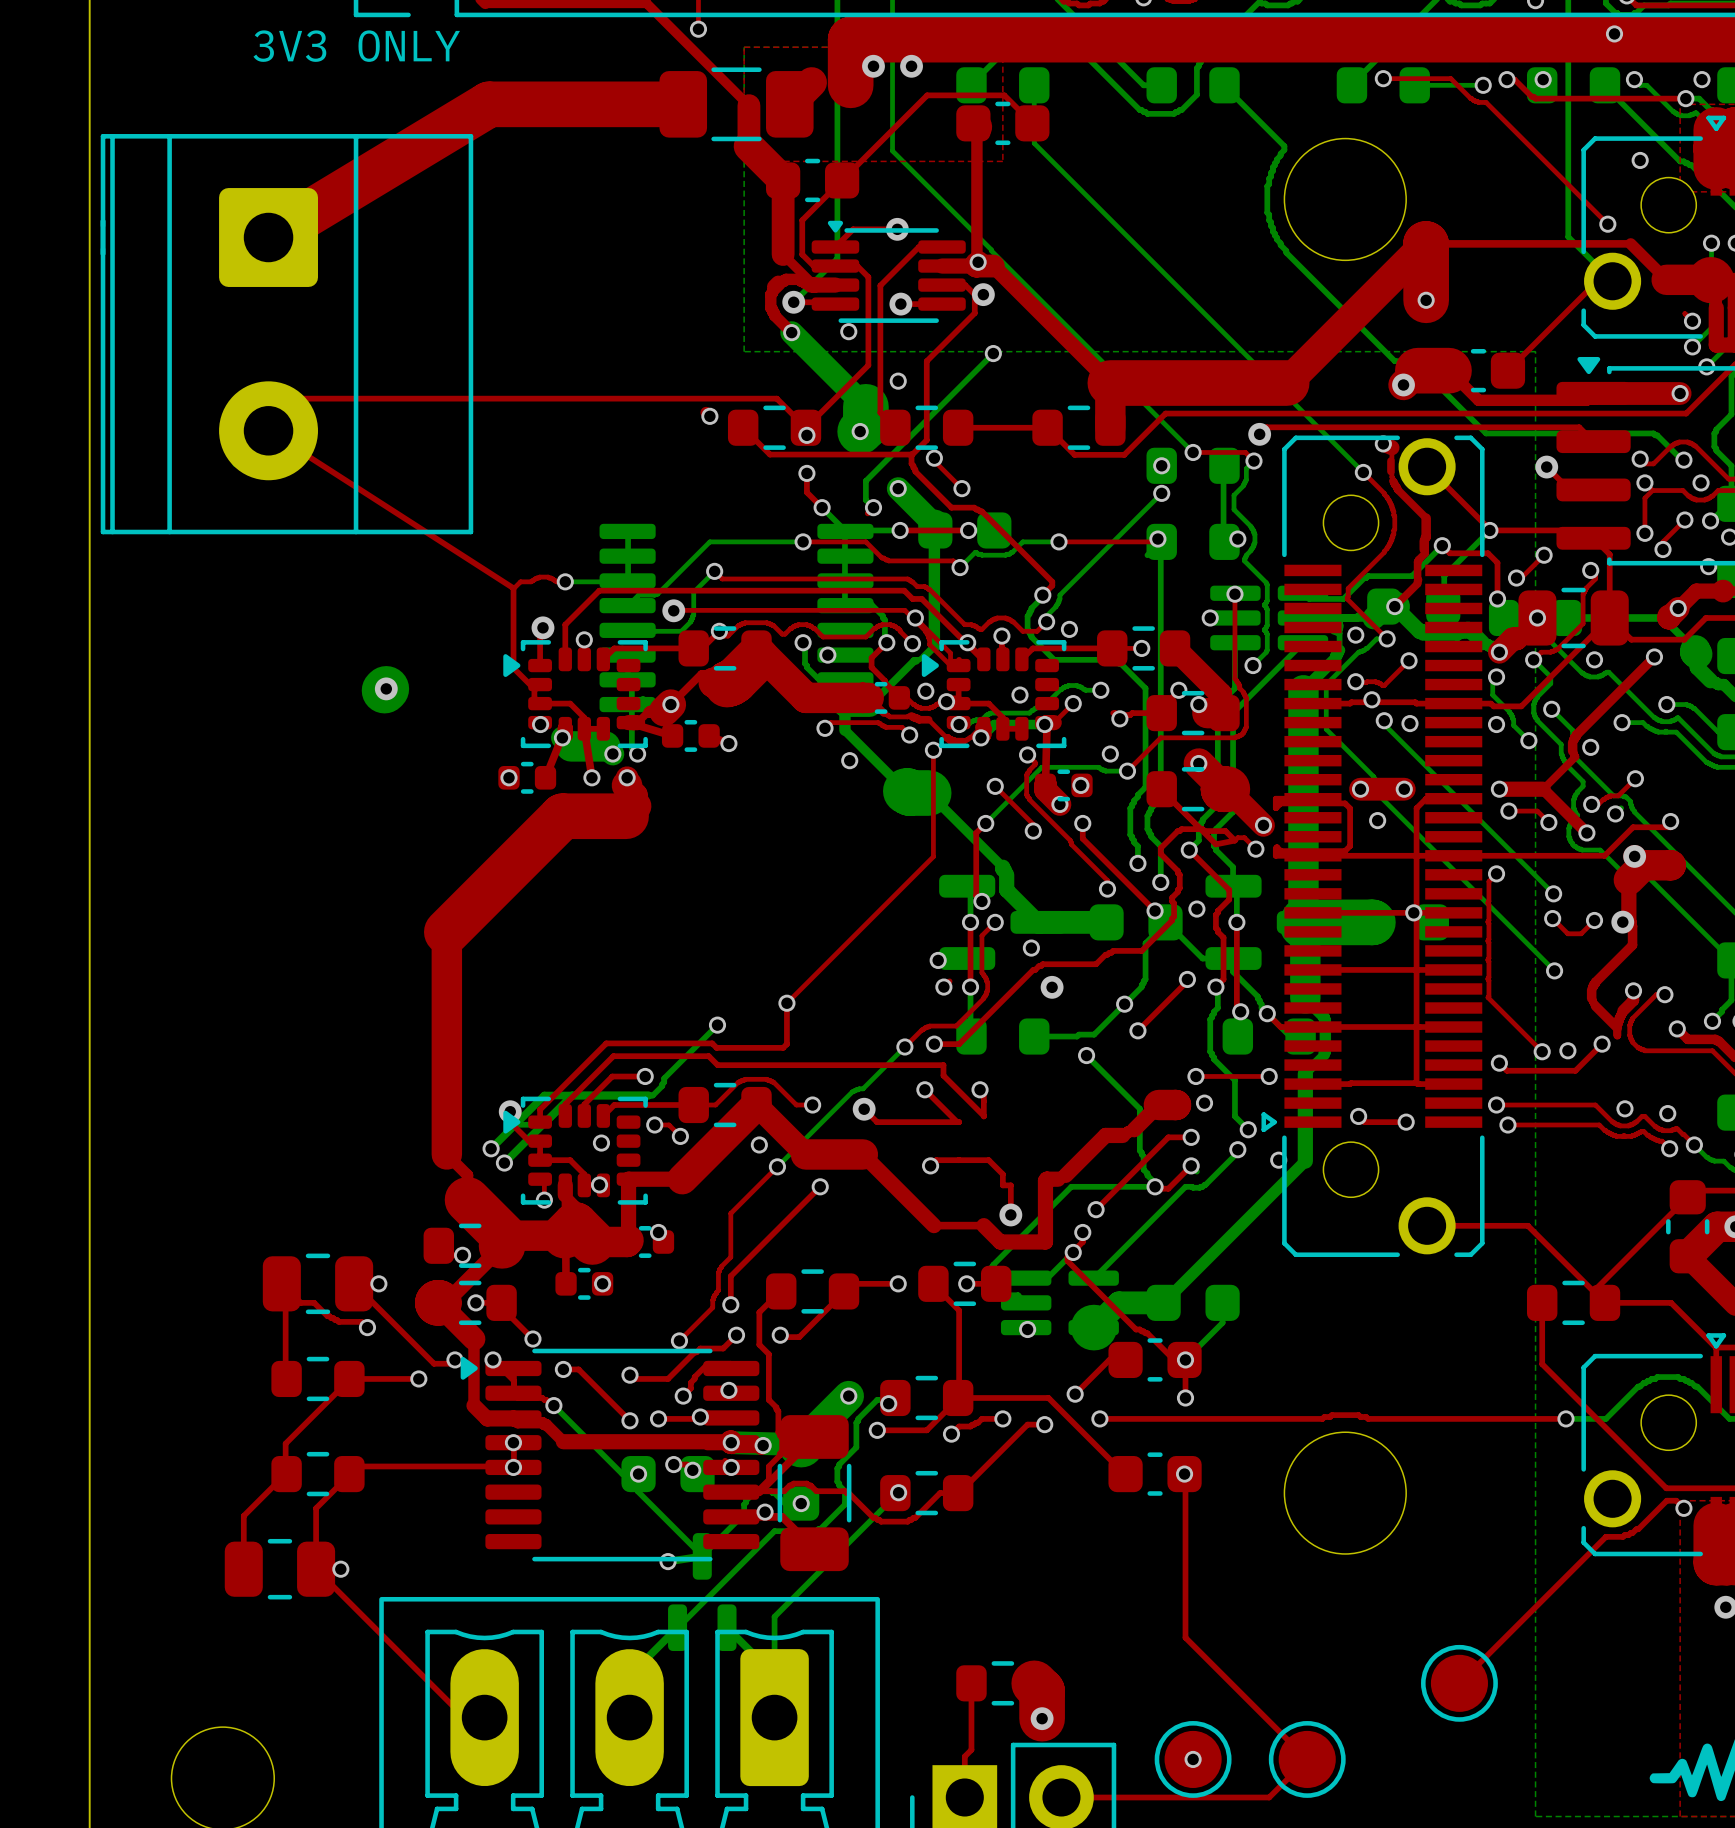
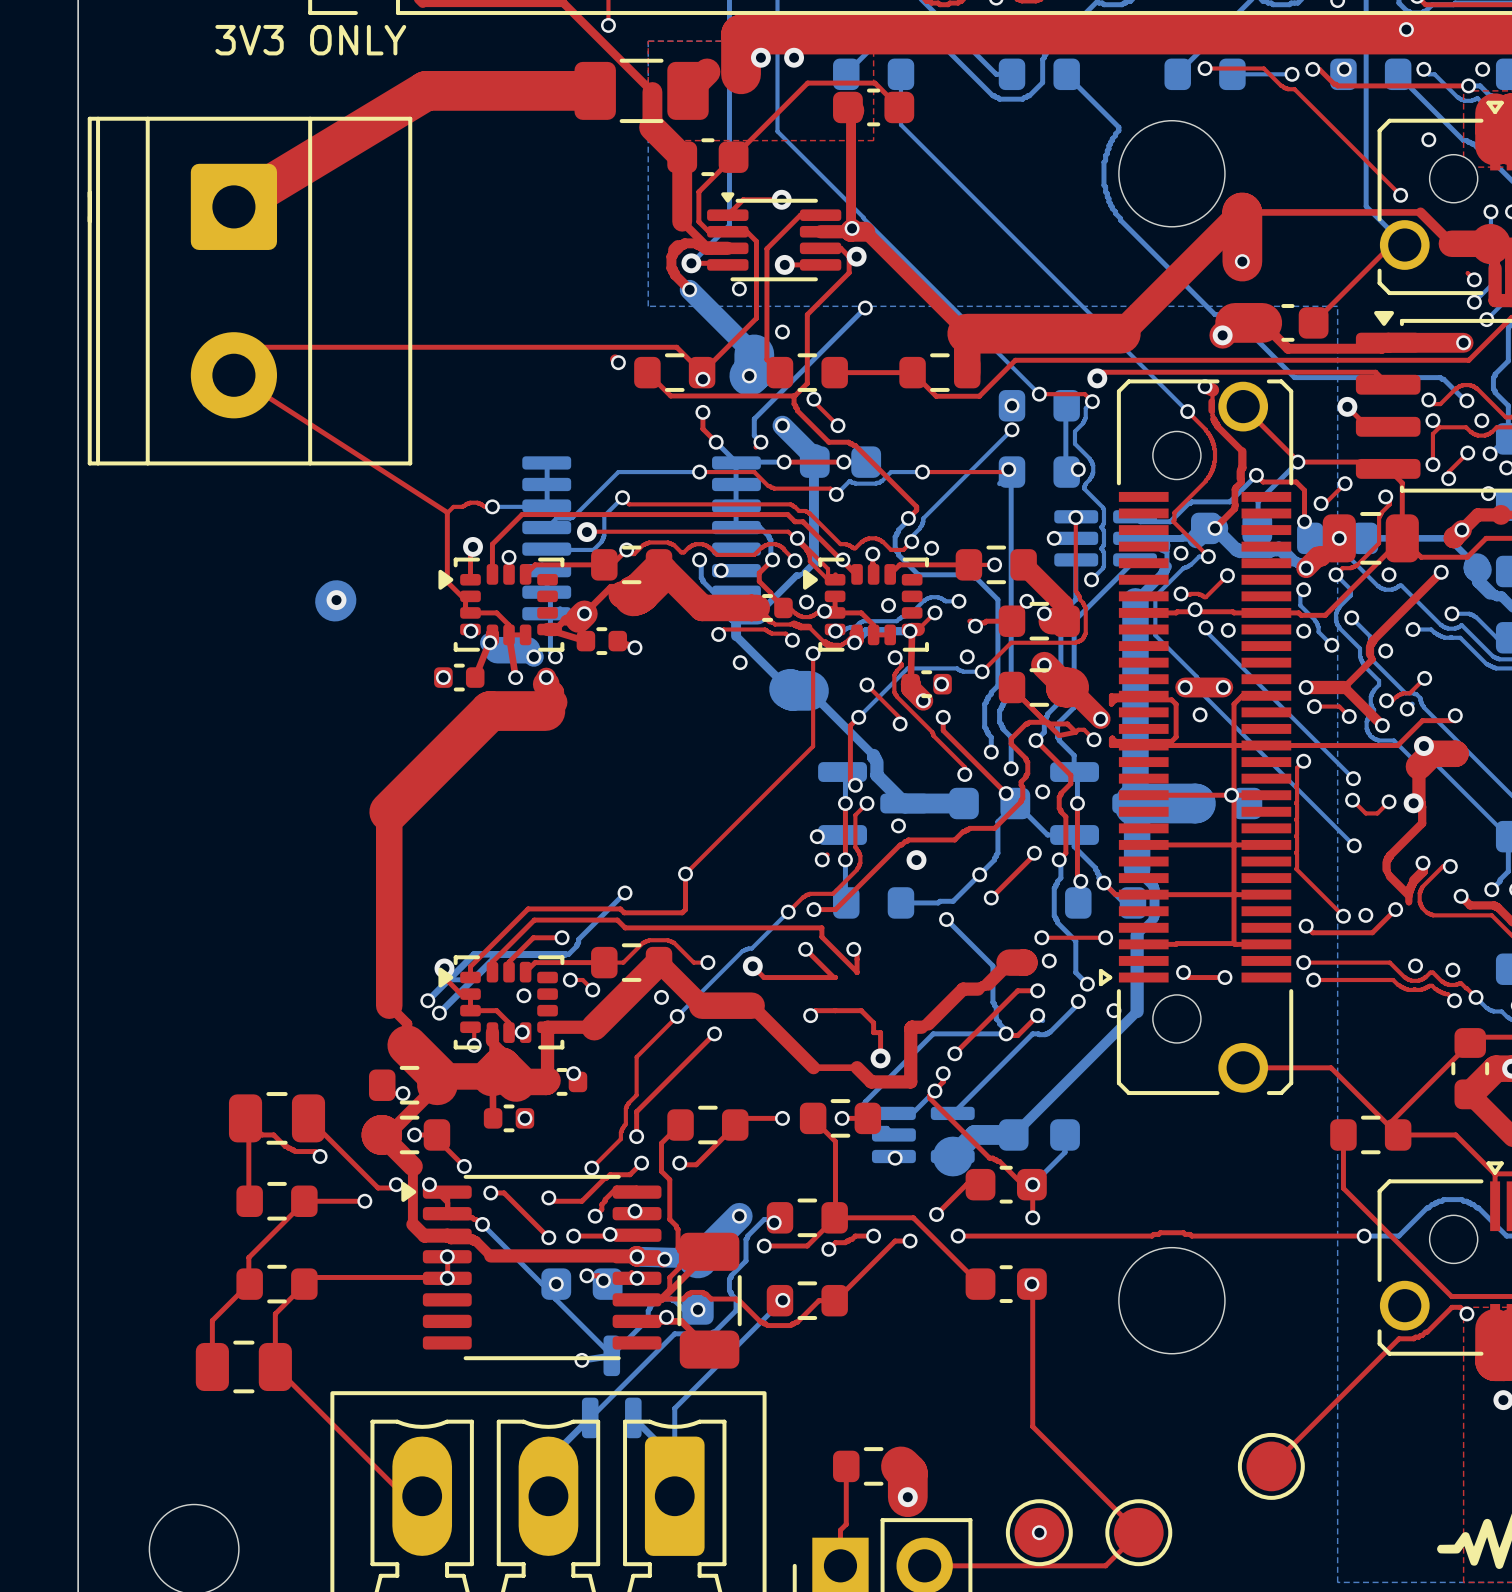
via: (378, 1283) -> none
via: (340, 1569) -> none

